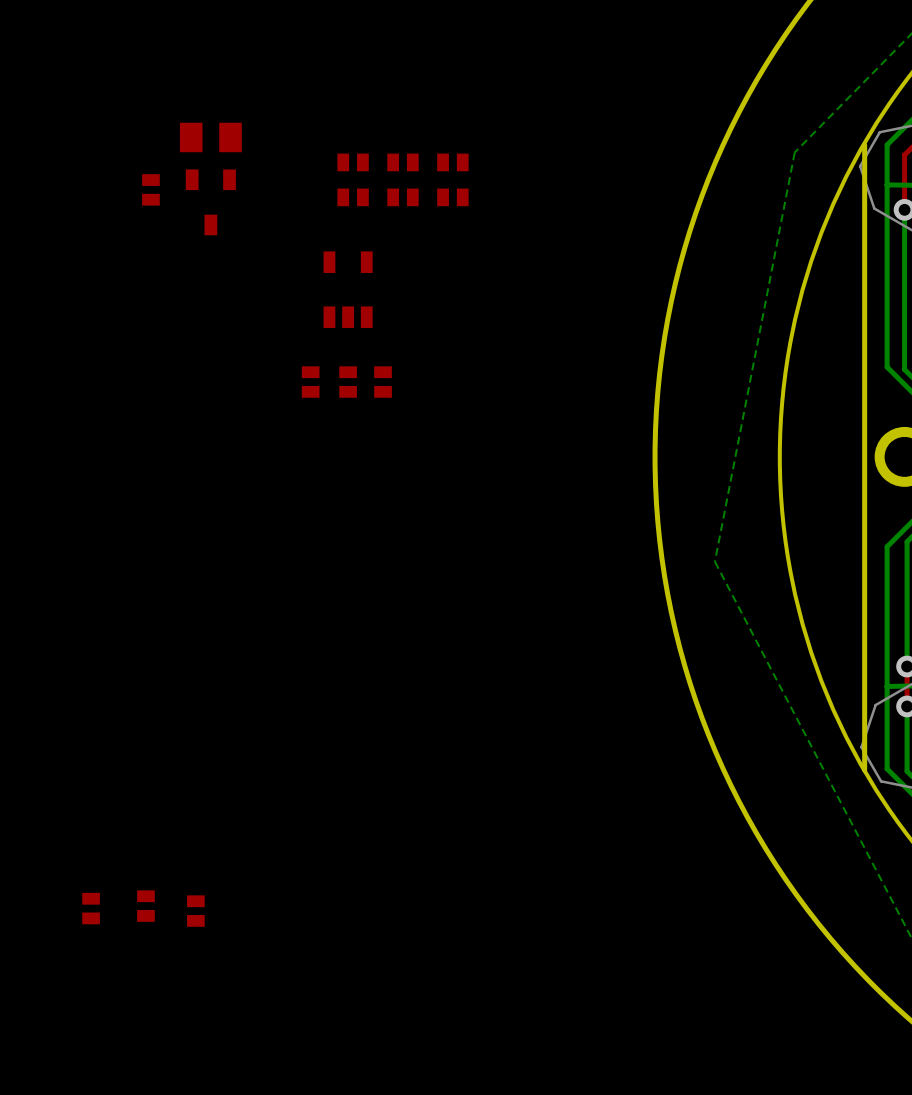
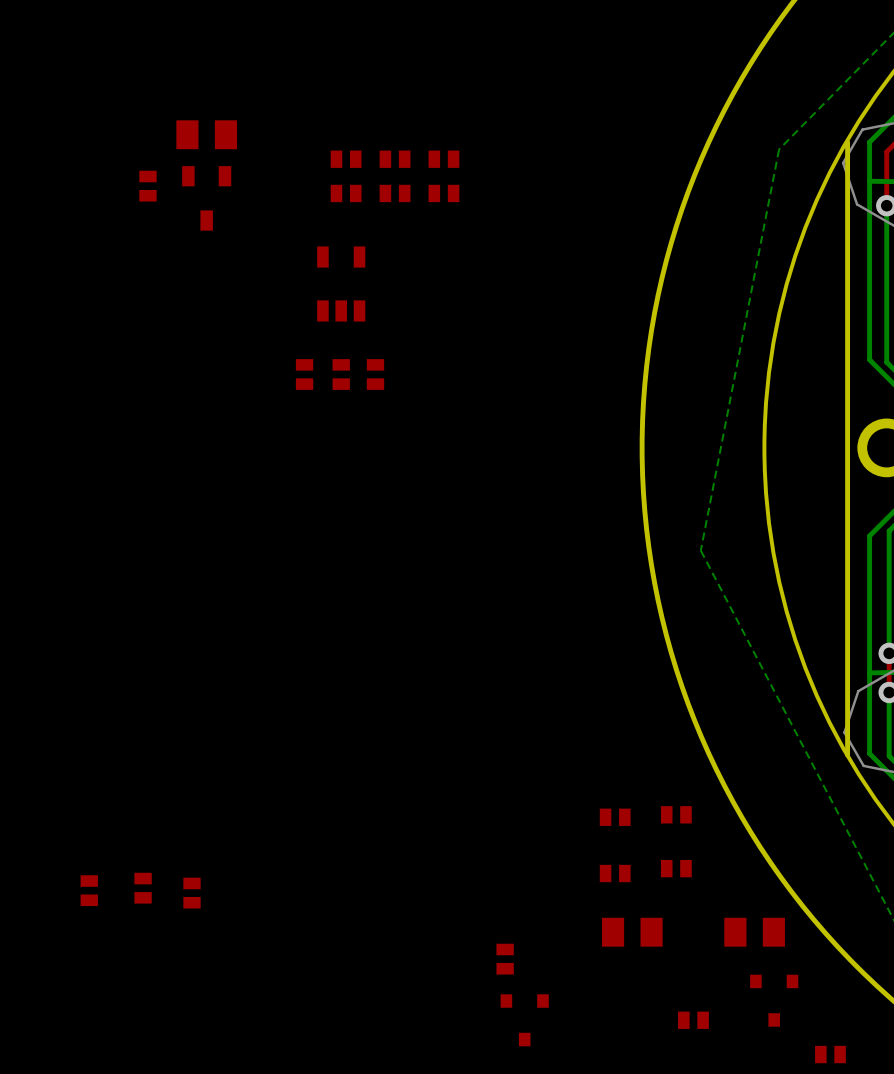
part: none -> (676, 814)
part: none -> (615, 817)
part: none -> (676, 868)
part: none -> (615, 873)
part: none -> (632, 932)
part: none -> (754, 932)
part: none -> (505, 959)
part: none -> (774, 1000)
part: none -> (524, 1020)
part: none -> (693, 1020)
part: none -> (830, 1054)

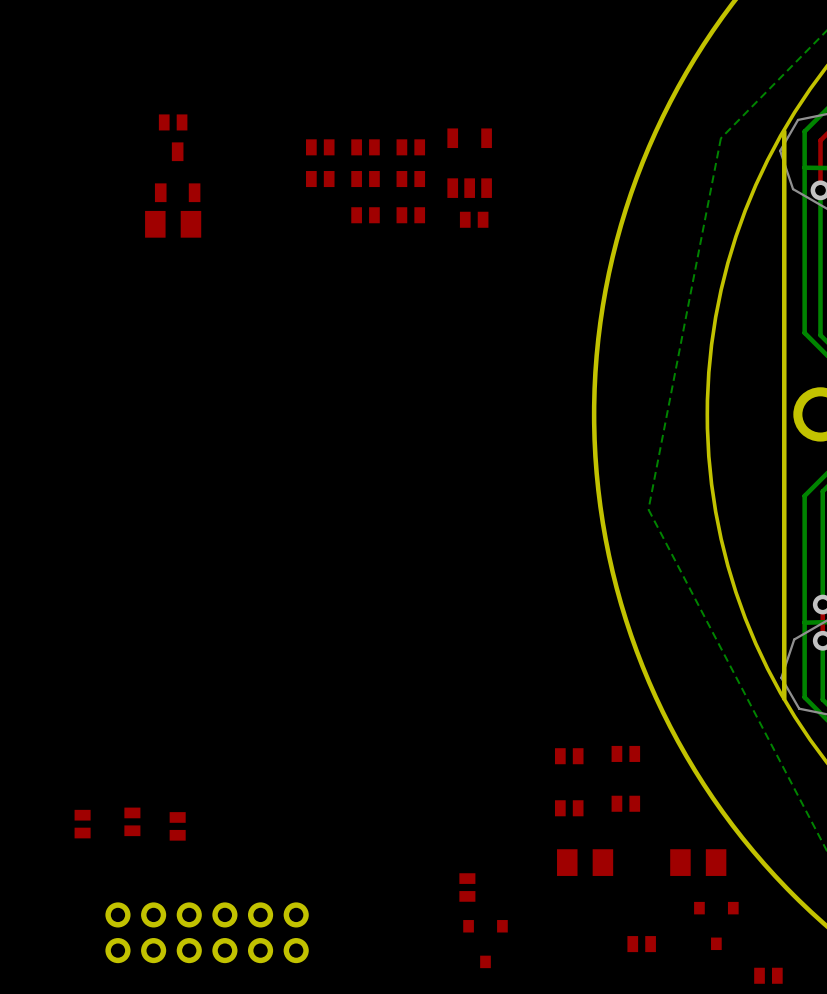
part position: (206, 134) -> (173, 224)
part rotation: 0° (147, 186) -> 90° clockwise (173, 122)
part position: (147, 186) -> (173, 122)
part rotation: 0° (206, 198) -> 180° (177, 172)
part: none -> (365, 215)
part: none -> (410, 215)
part: none -> (474, 219)
part position: (341, 283) -> (469, 163)
part: (304, 374) -> none
part: (341, 374) -> none
part: (375, 374) -> none
part: none -> (207, 932)

